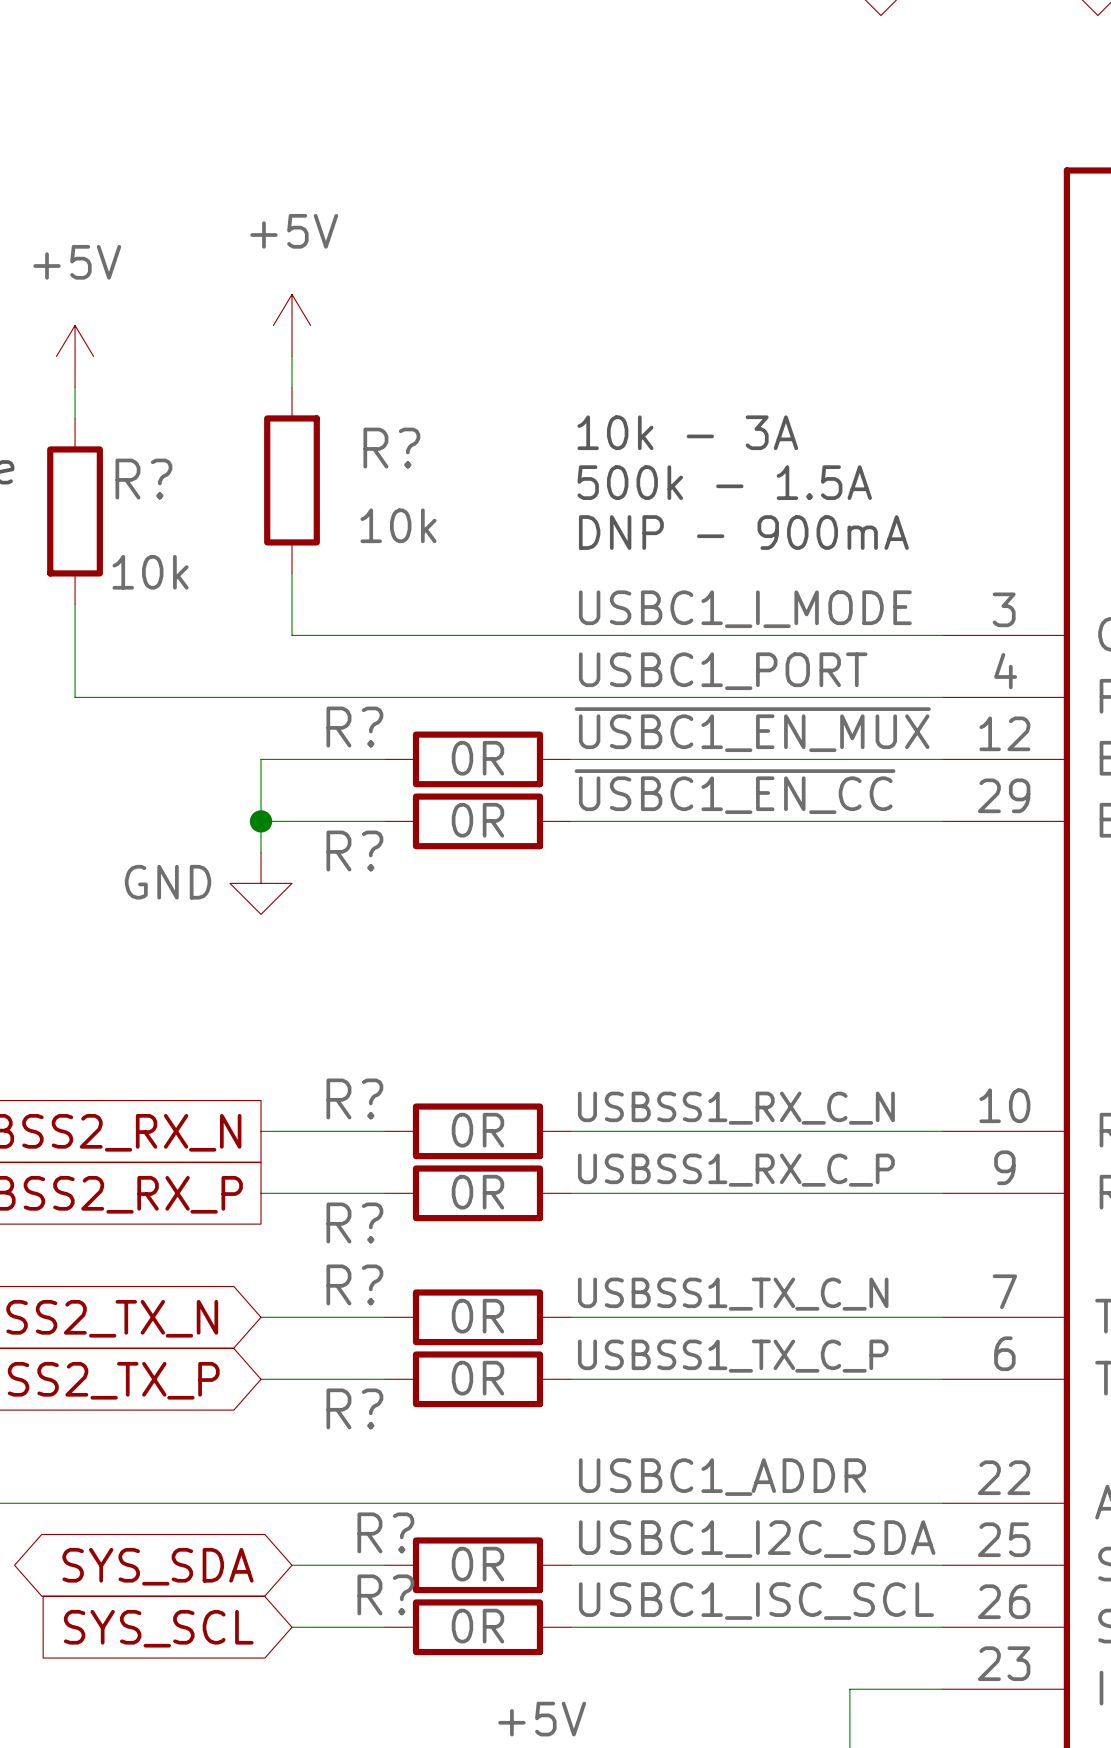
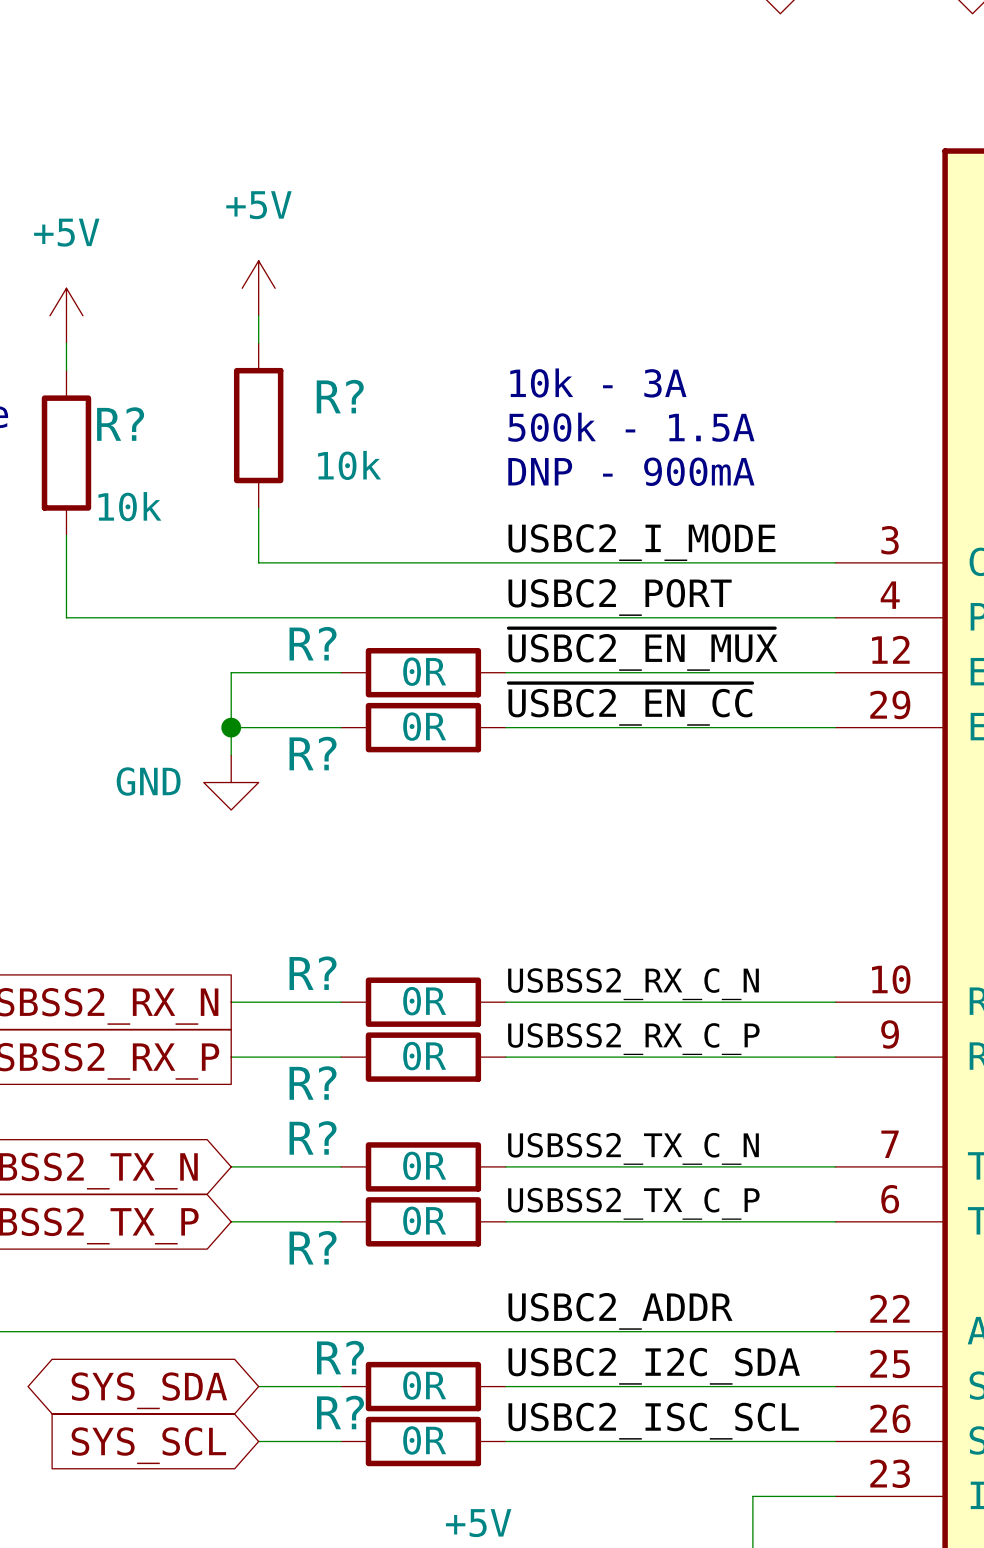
label: USBC1_I_MODE (745, 609) -> USBC2_I_MODE (641, 542)
label: USBC1_PORT (723, 671) -> USBC2_PORT (620, 597)
label: ~{USBC1_EN_MUX} (752, 729) -> ~{USBC2_EN_MUX} (643, 649)
label: ~{USBC1_EN_CC} (735, 791) -> ~{USBC2_EN_CC} (630, 704)
label: USBSS1_RX_C_N (736, 1108) -> USBSS2_RX_C_N (633, 984)
label: USBSS1_RX_C_P (736, 1170) -> USBSS2_RX_C_P (633, 1039)
label: USBSS1_TX_C_N (733, 1294) -> USBSS2_TX_C_N (633, 1148)
label: USBSS1_TX_C_P (733, 1356) -> USBSS2_TX_C_P (633, 1203)
label: USBC1_ADDR (722, 1477) -> USBC2_ADDR (620, 1311)
label: USBC1_I2C_SDA (757, 1539) -> USBC2_I2C_SDA (654, 1366)
label: USBC1_ISC_SCL (756, 1601) -> USBC2_ISC_SCL (653, 1421)

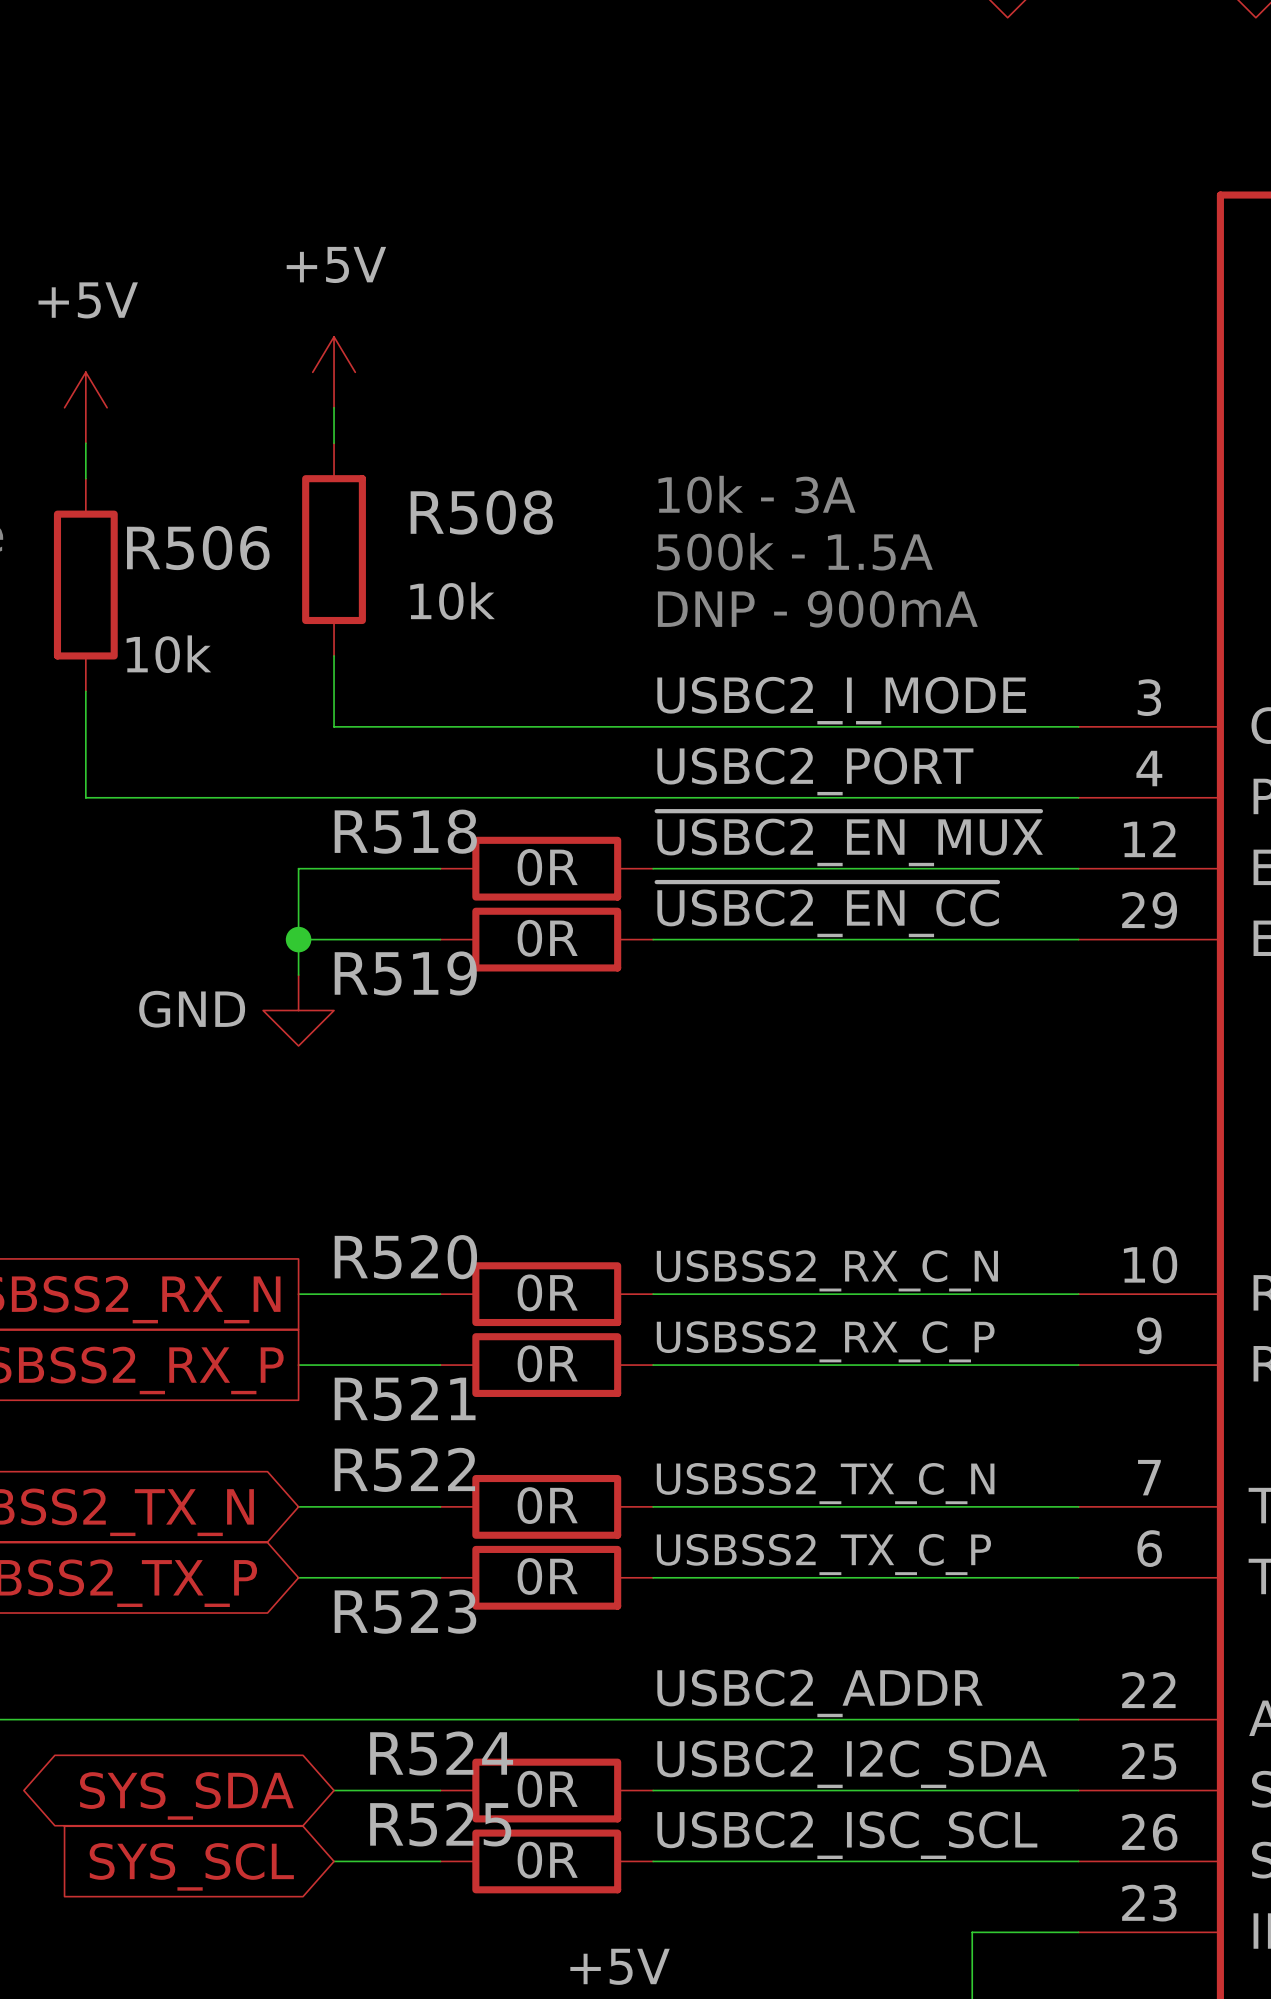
R? name: R? (340, 396) -> R508 (481, 512)
R? name: R? (120, 424) -> R506 (198, 548)
R? name: R? (313, 643) -> R518 (405, 831)
R? name: R? (313, 753) -> R519 (405, 973)
R? name: R? (313, 973) -> R520 (405, 1257)
R? name: R? (313, 1083) -> R521 (405, 1398)
R? name: R? (313, 1137) -> R522 (404, 1469)
R? name: R? (313, 1247) -> R523 (405, 1611)
R? name: R? (340, 1357) -> R524 (441, 1753)
R? name: R? (340, 1412) -> R525 (440, 1824)

